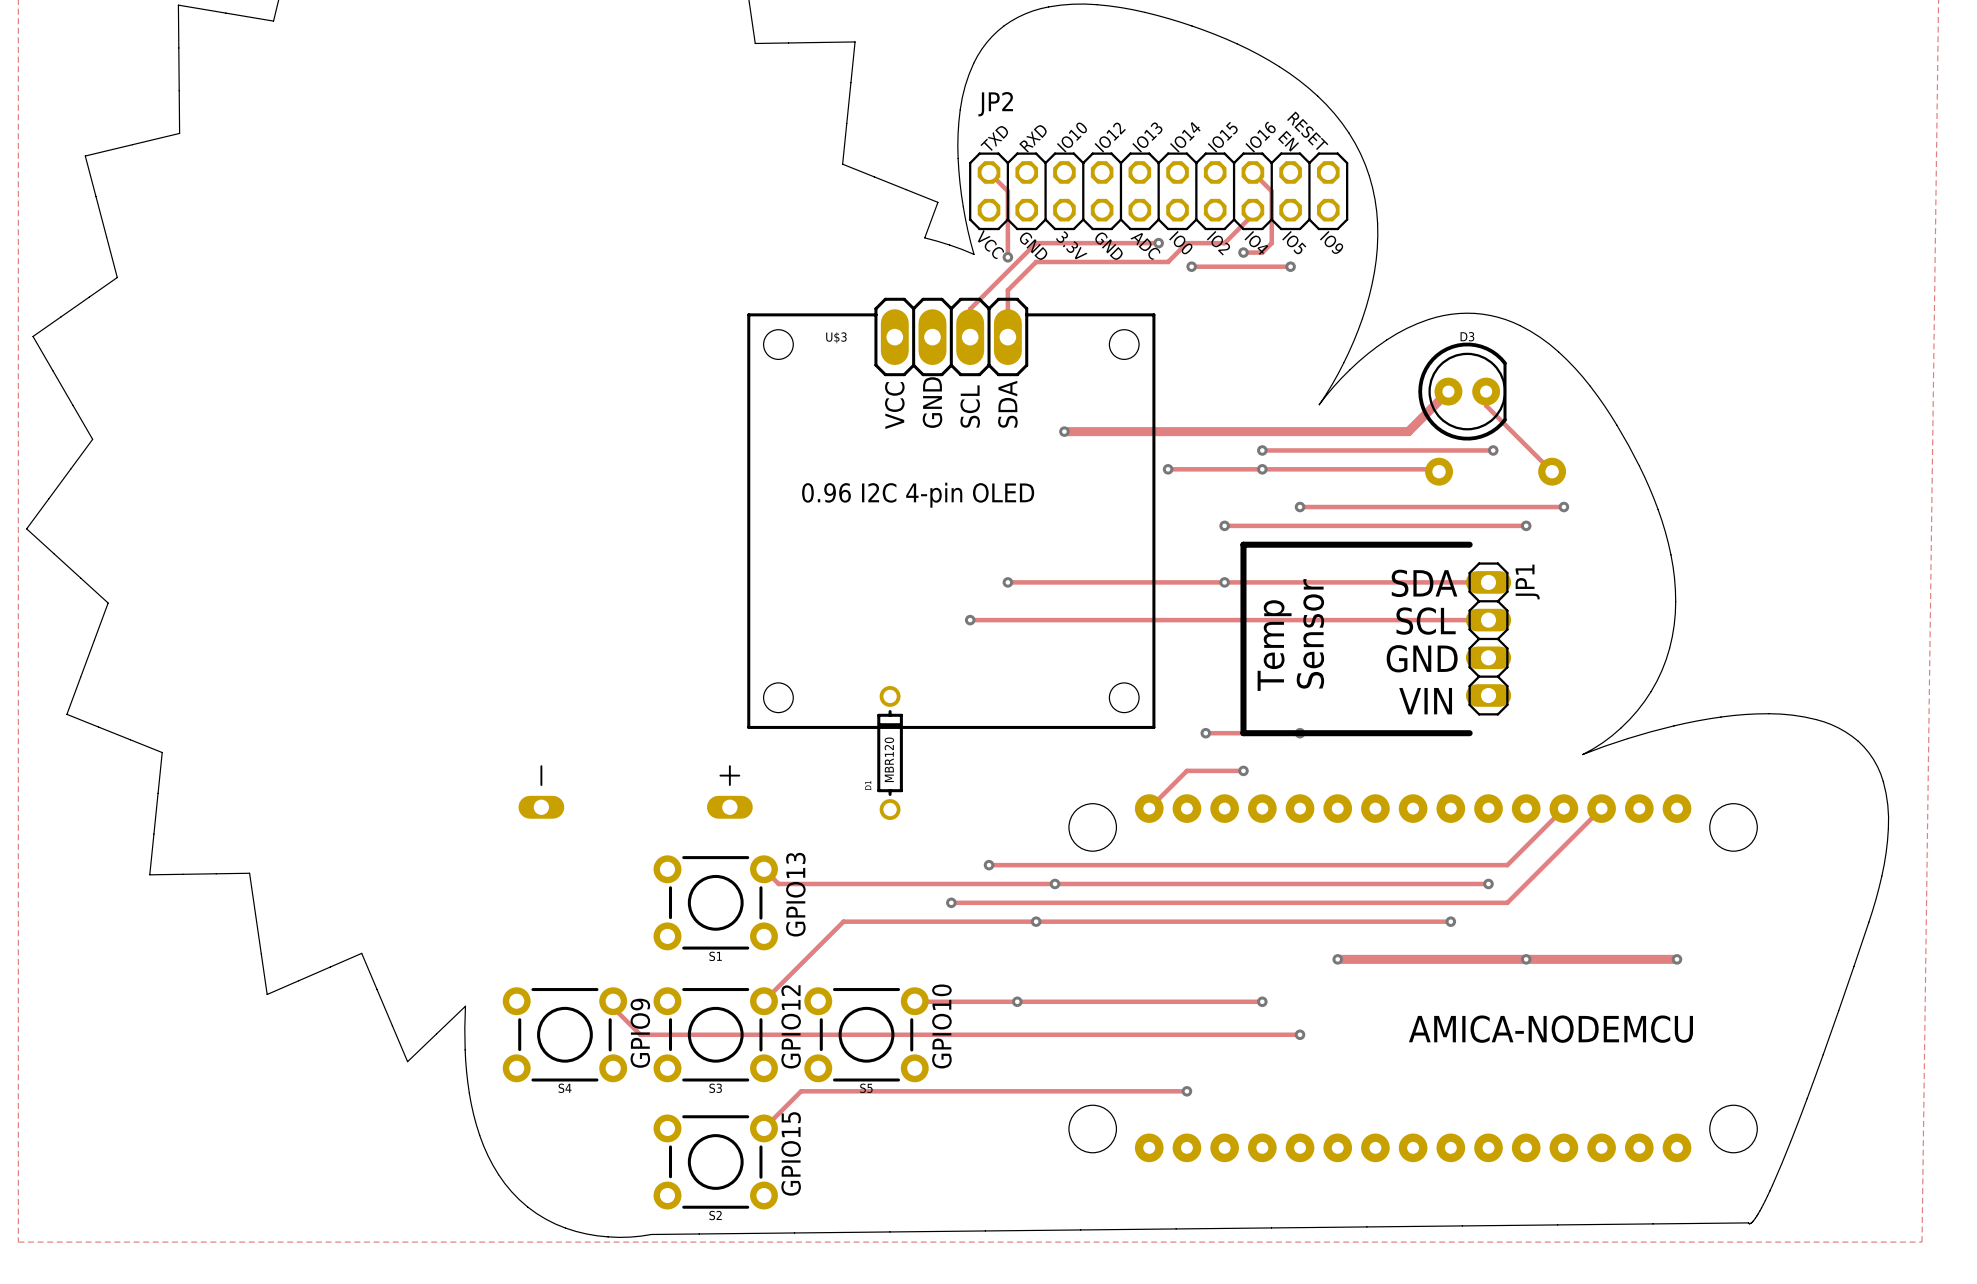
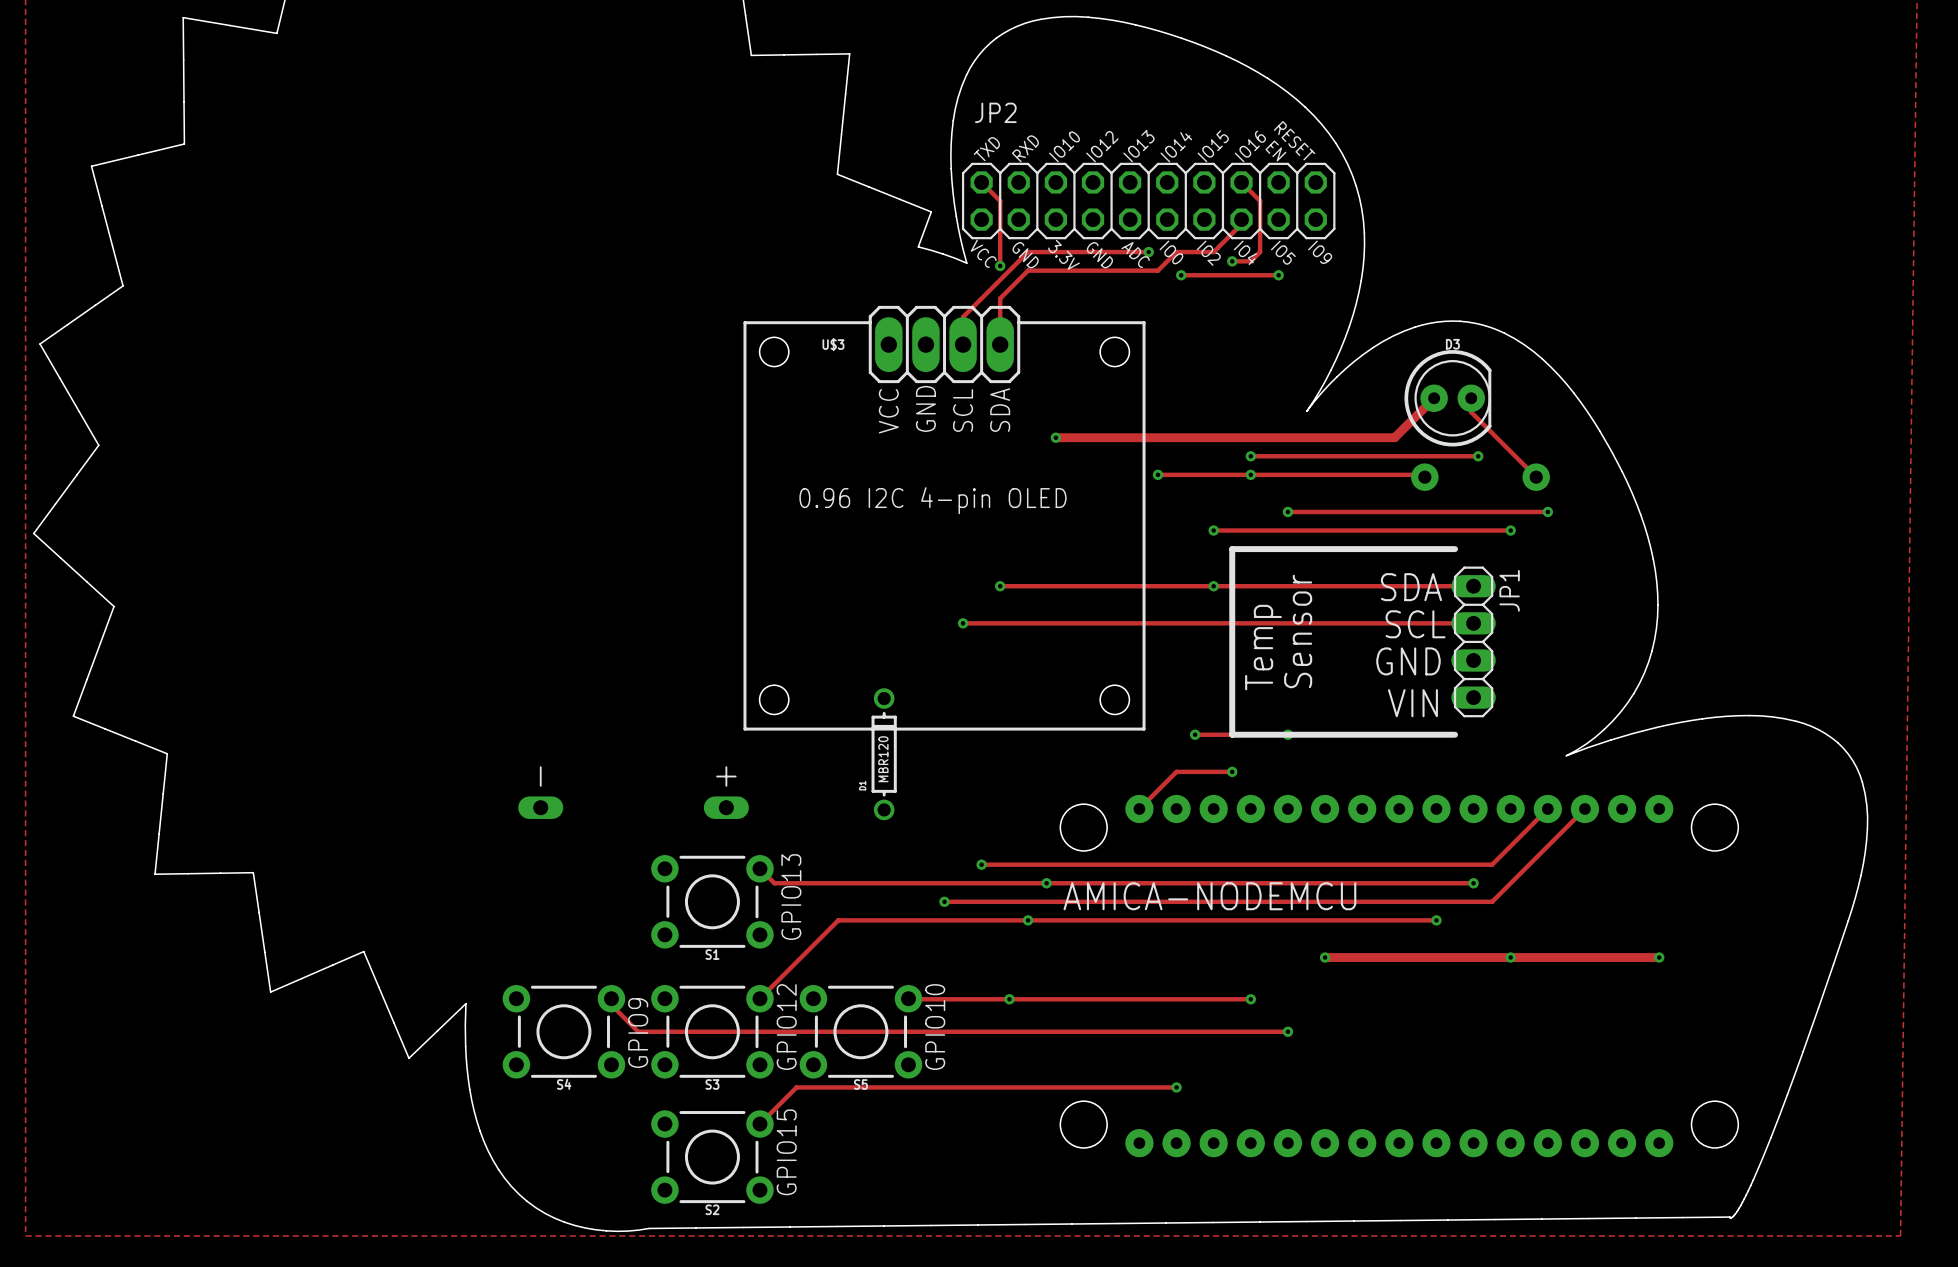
AMICA-NODEMCU name position: AMICA-NODEMCU (1550, 1029) -> AMICA-NODEMCU (1209, 896)

